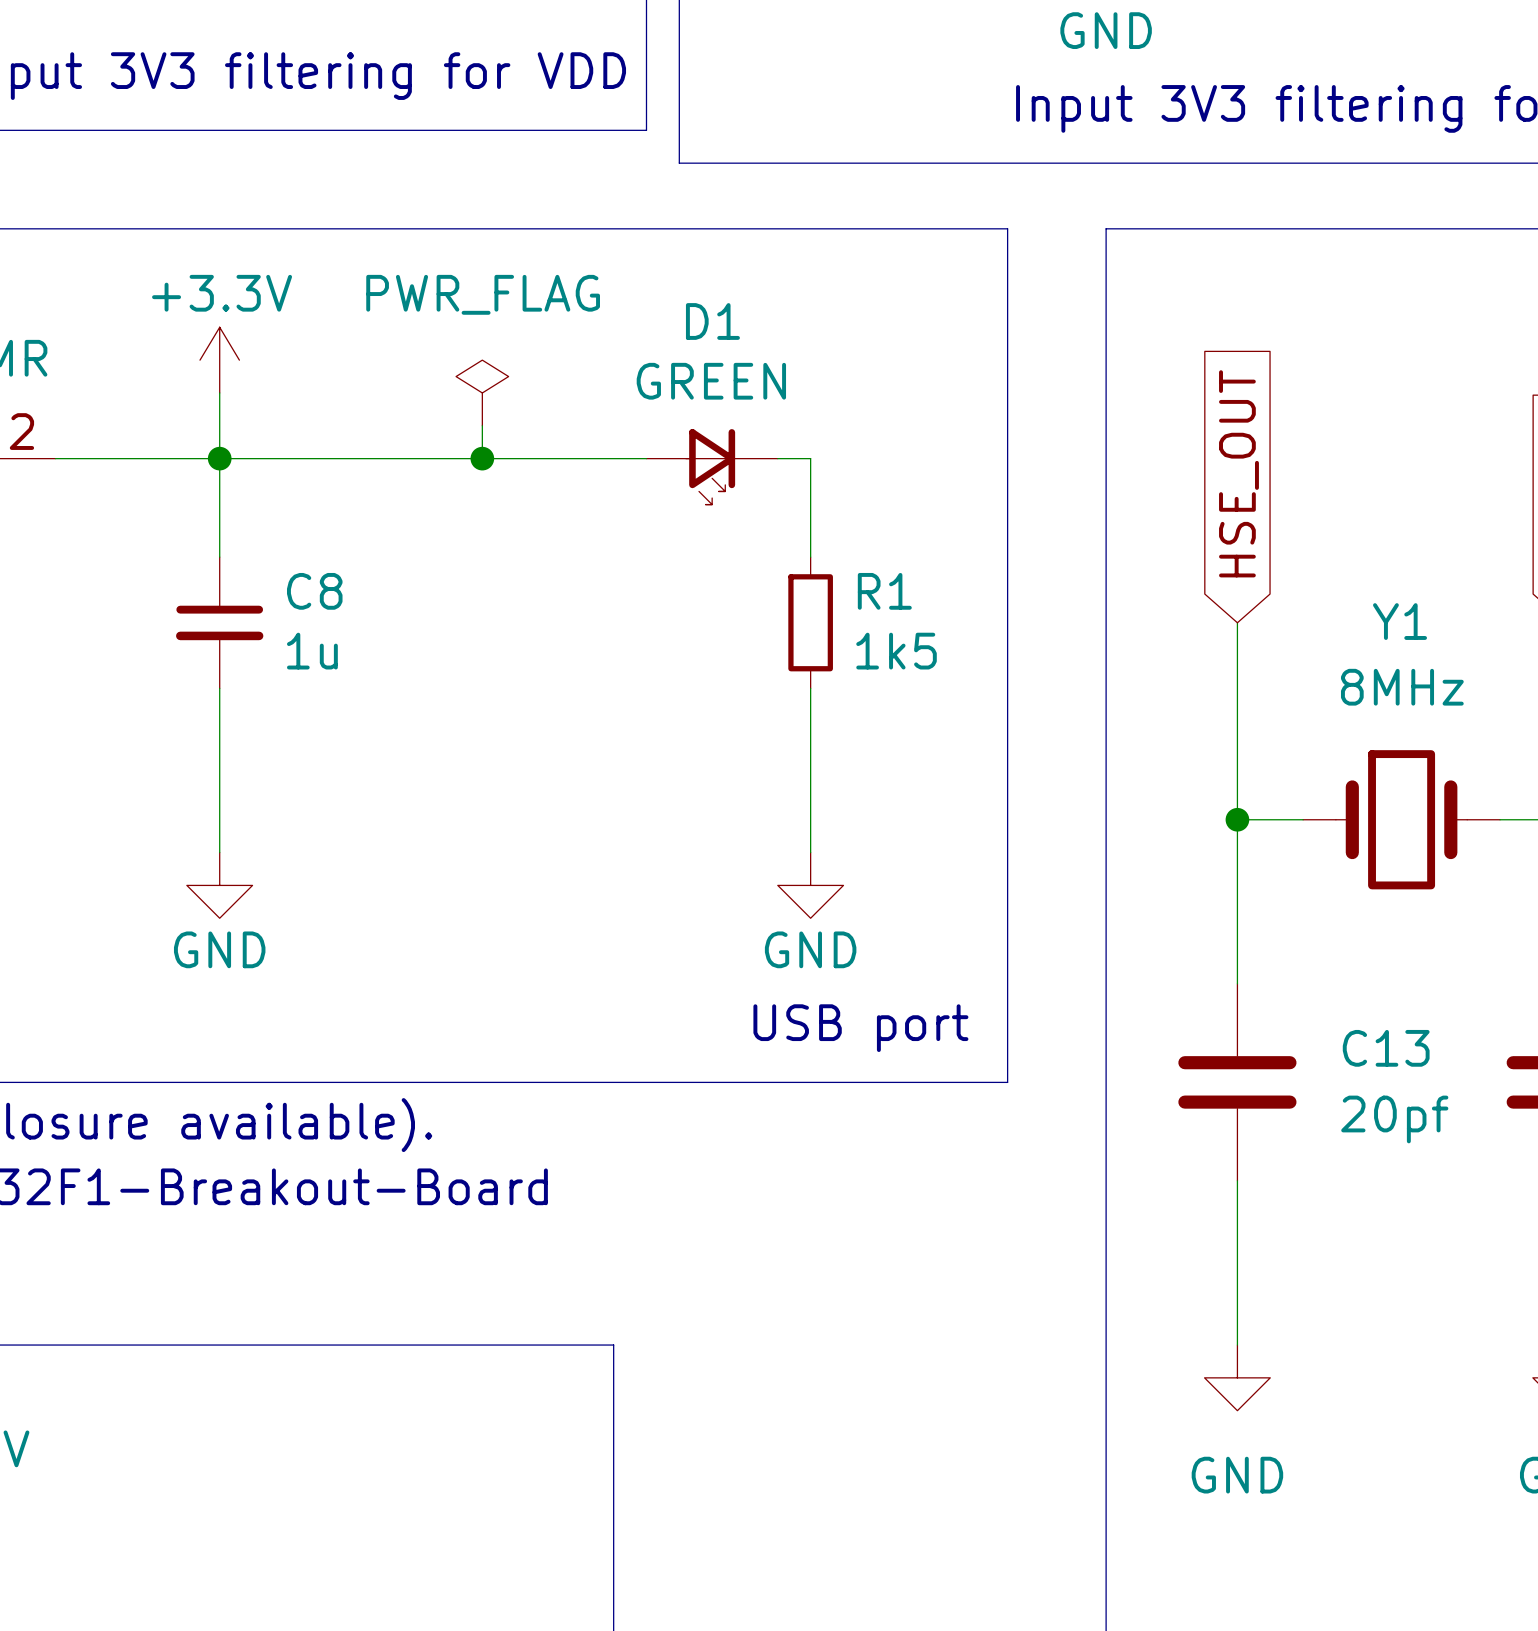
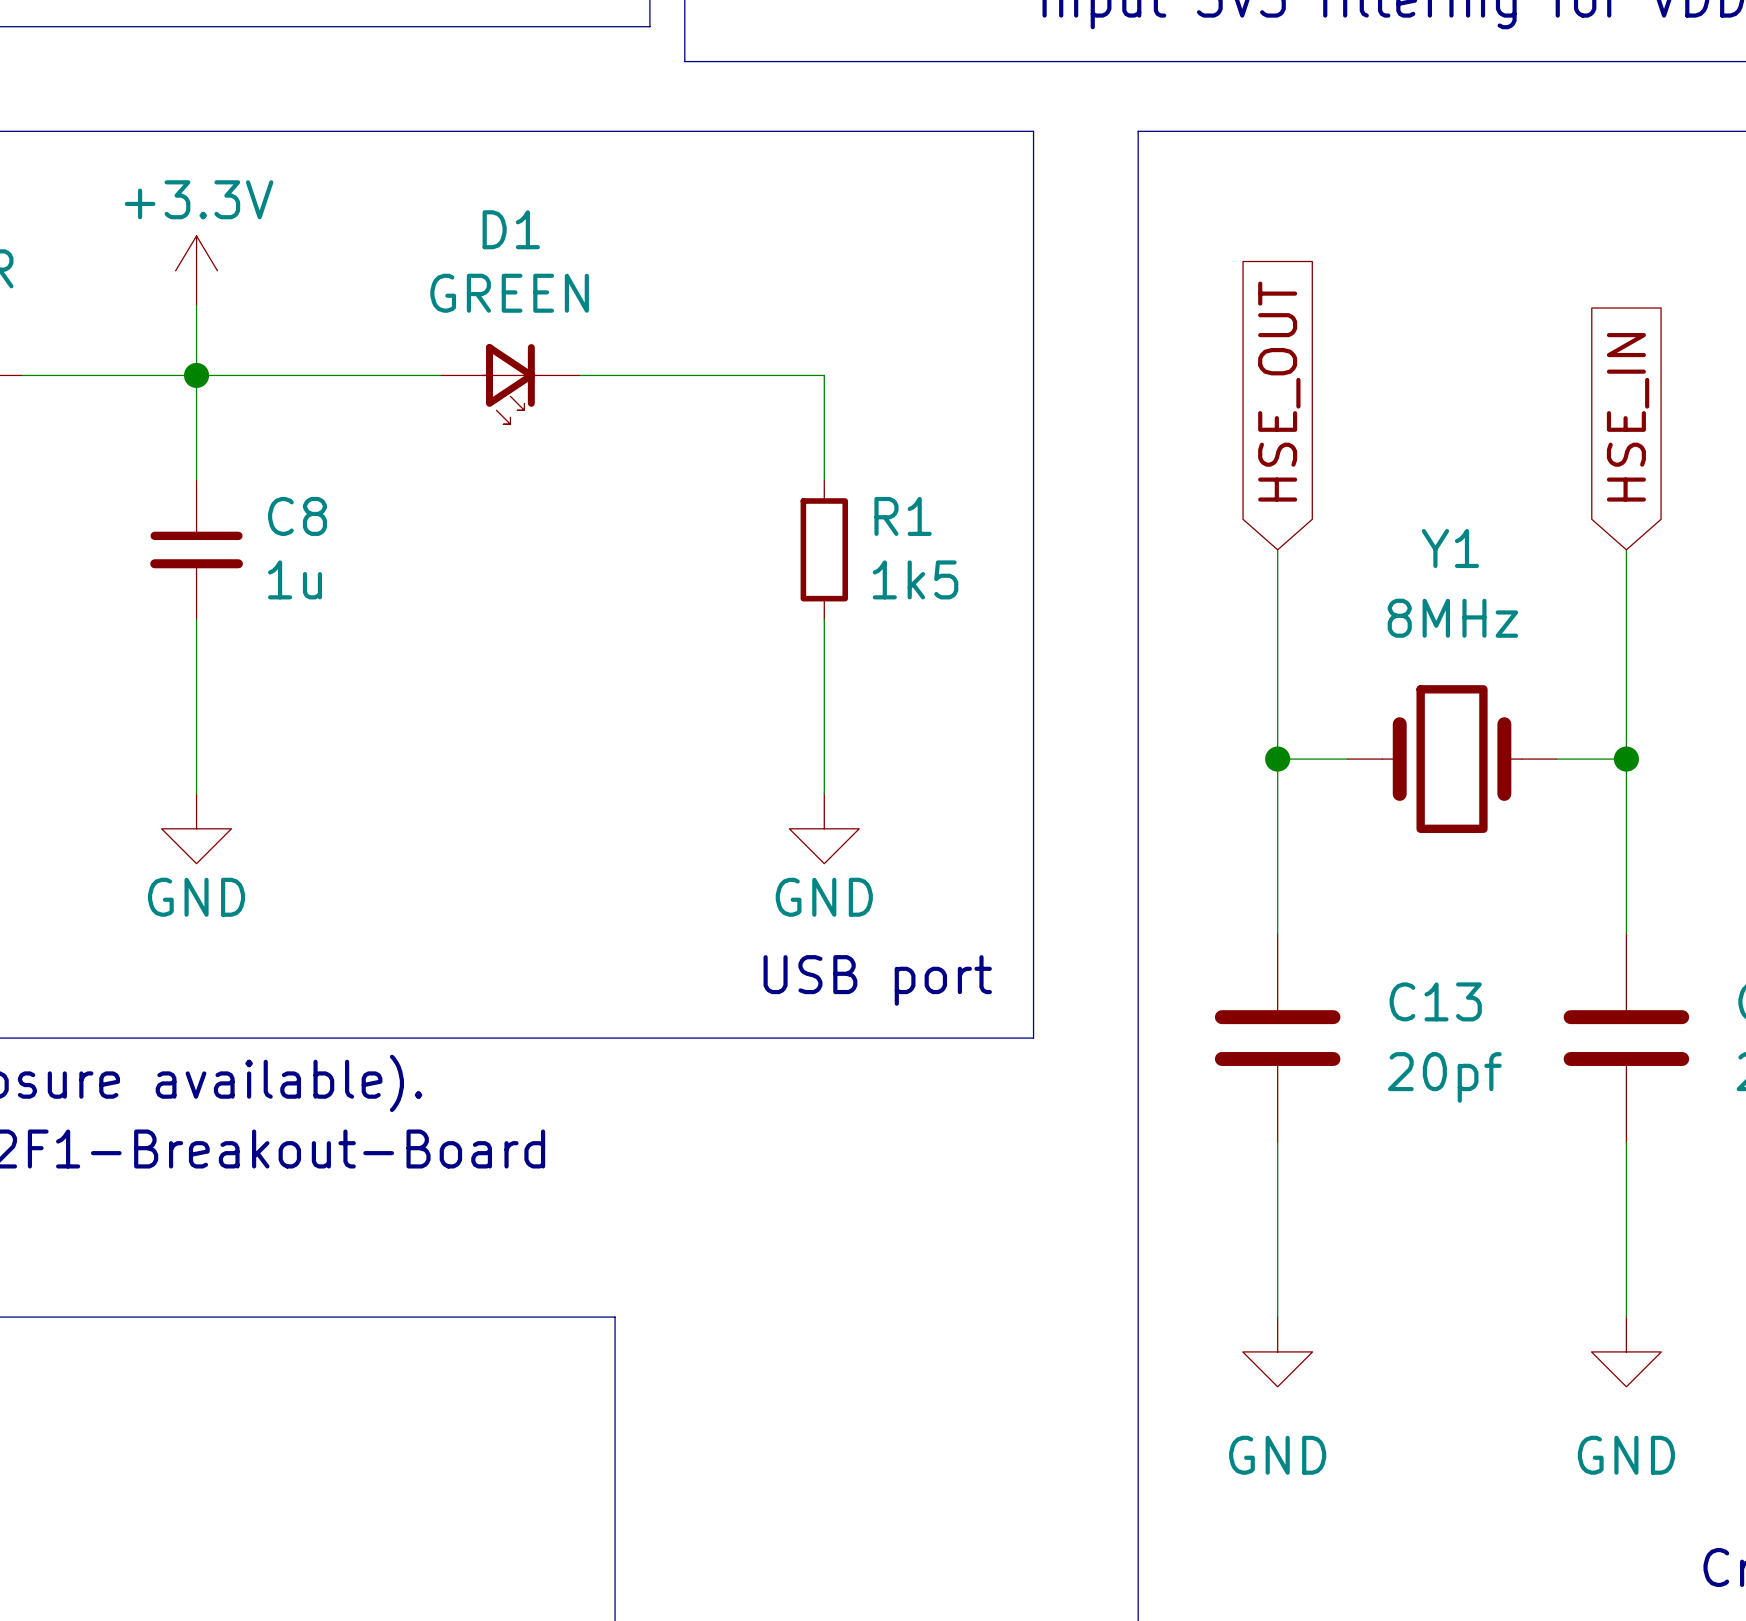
power symbol: PWR_FLAG (482, 392) -> none
wire: (482, 425) (482, 458) -> none
junction: (482, 458) -> none
D1 position: (712, 466) -> (510, 384)

